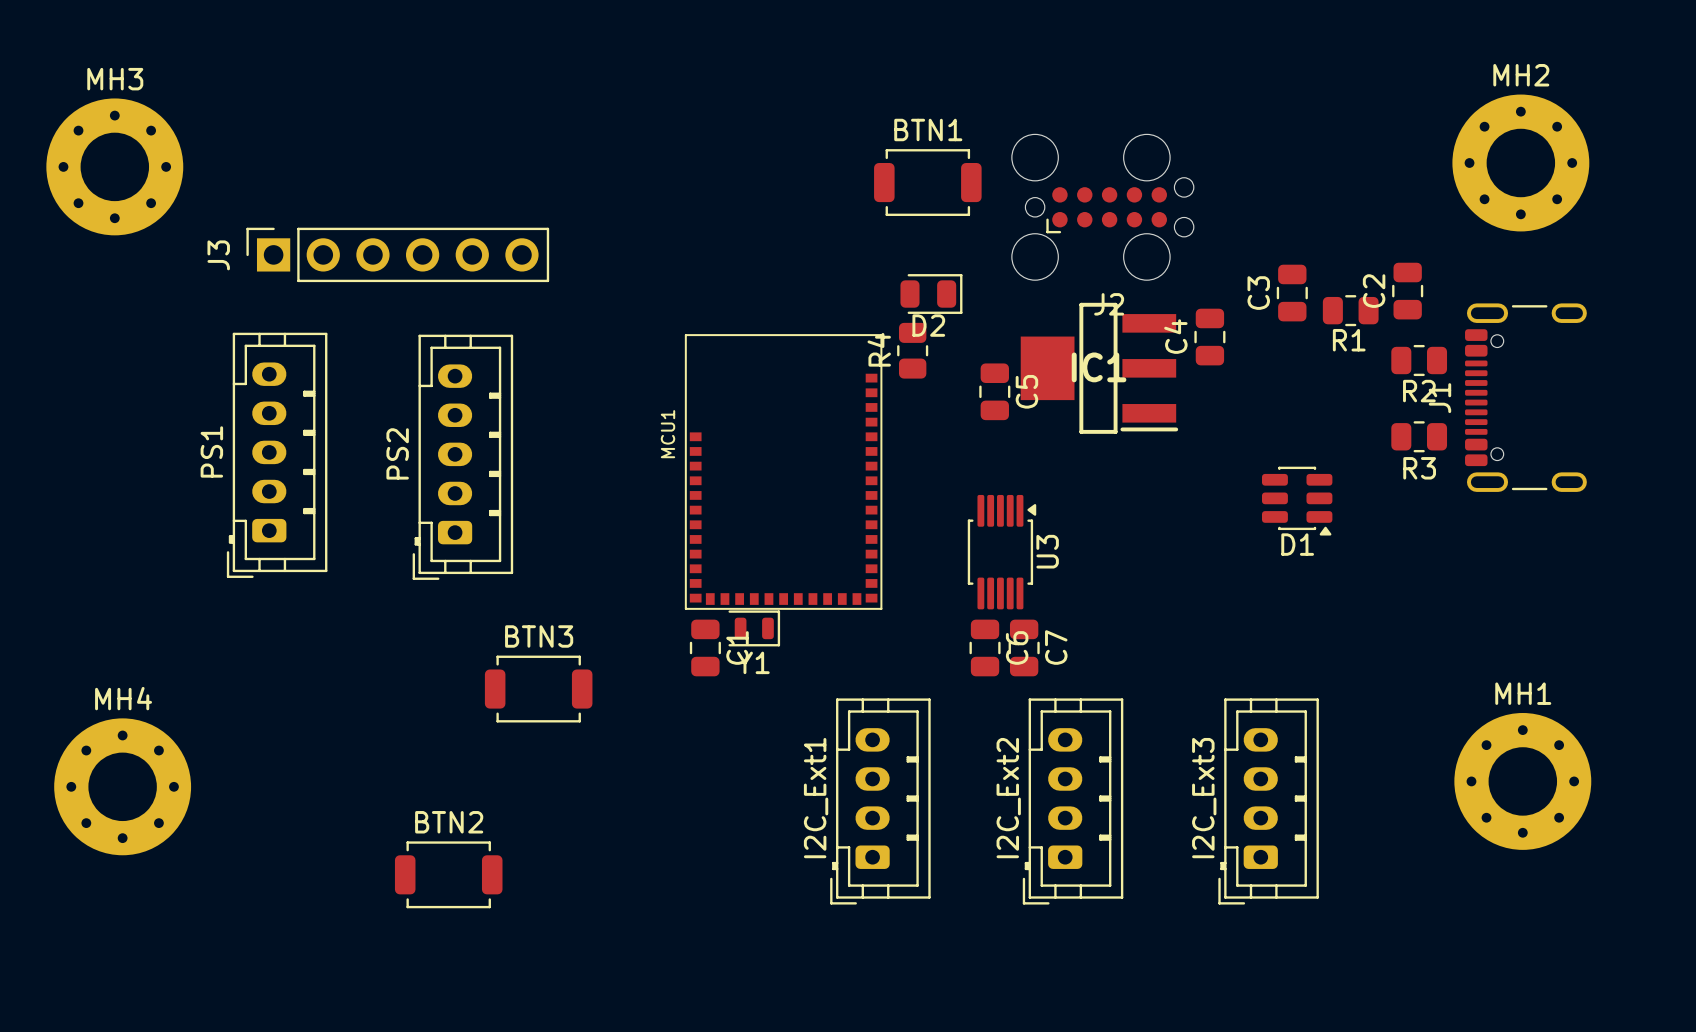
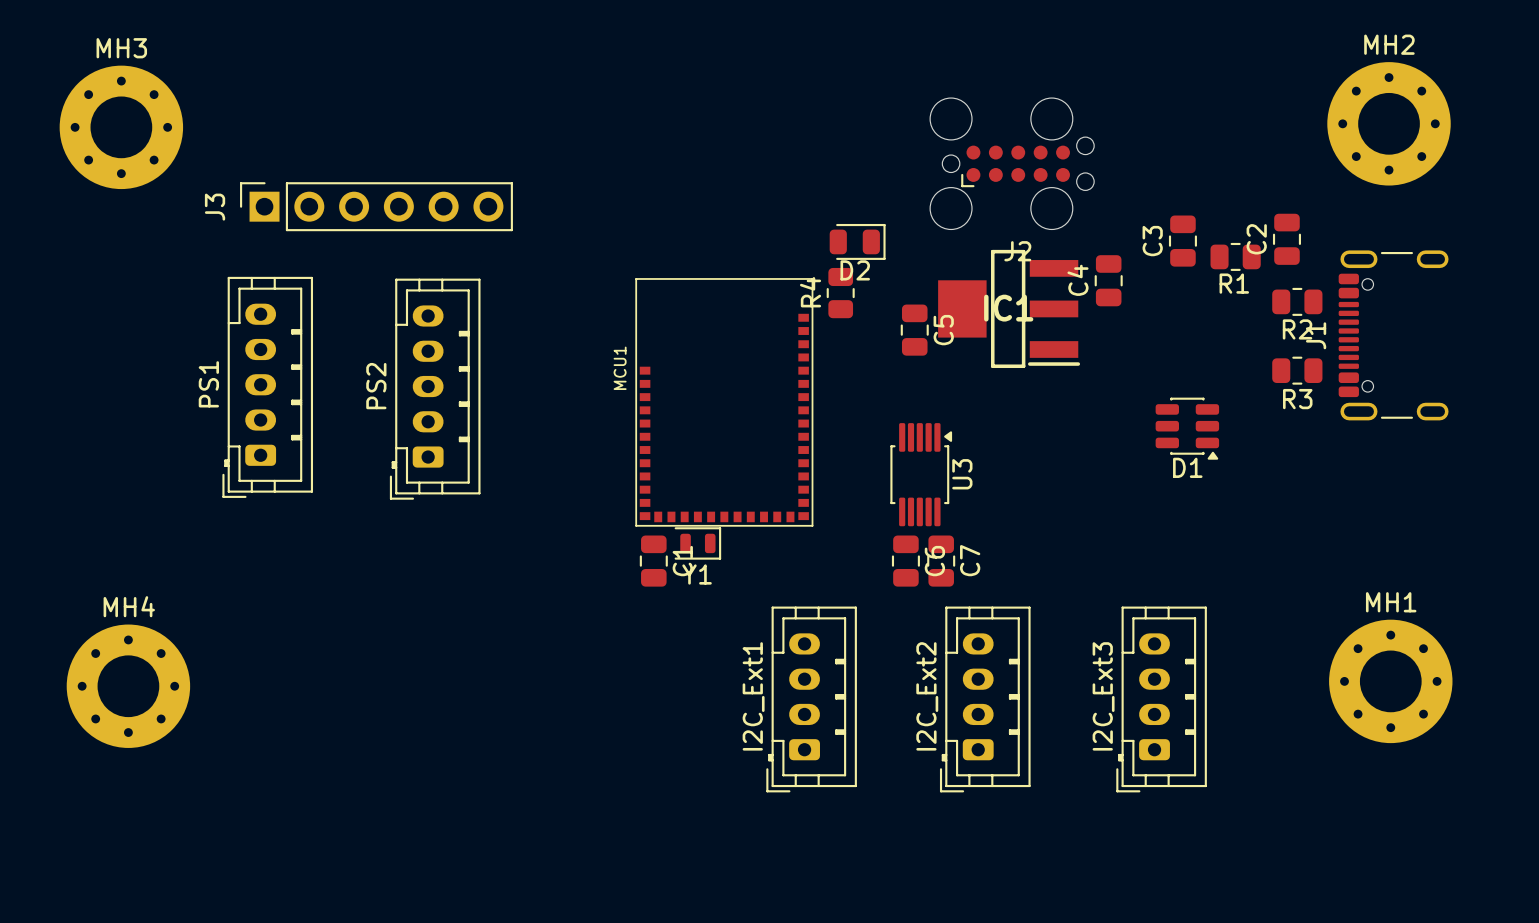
BTN1: (927, 182) -> none
BTN3: (538, 689) -> none
BTN2: (448, 874) -> none

